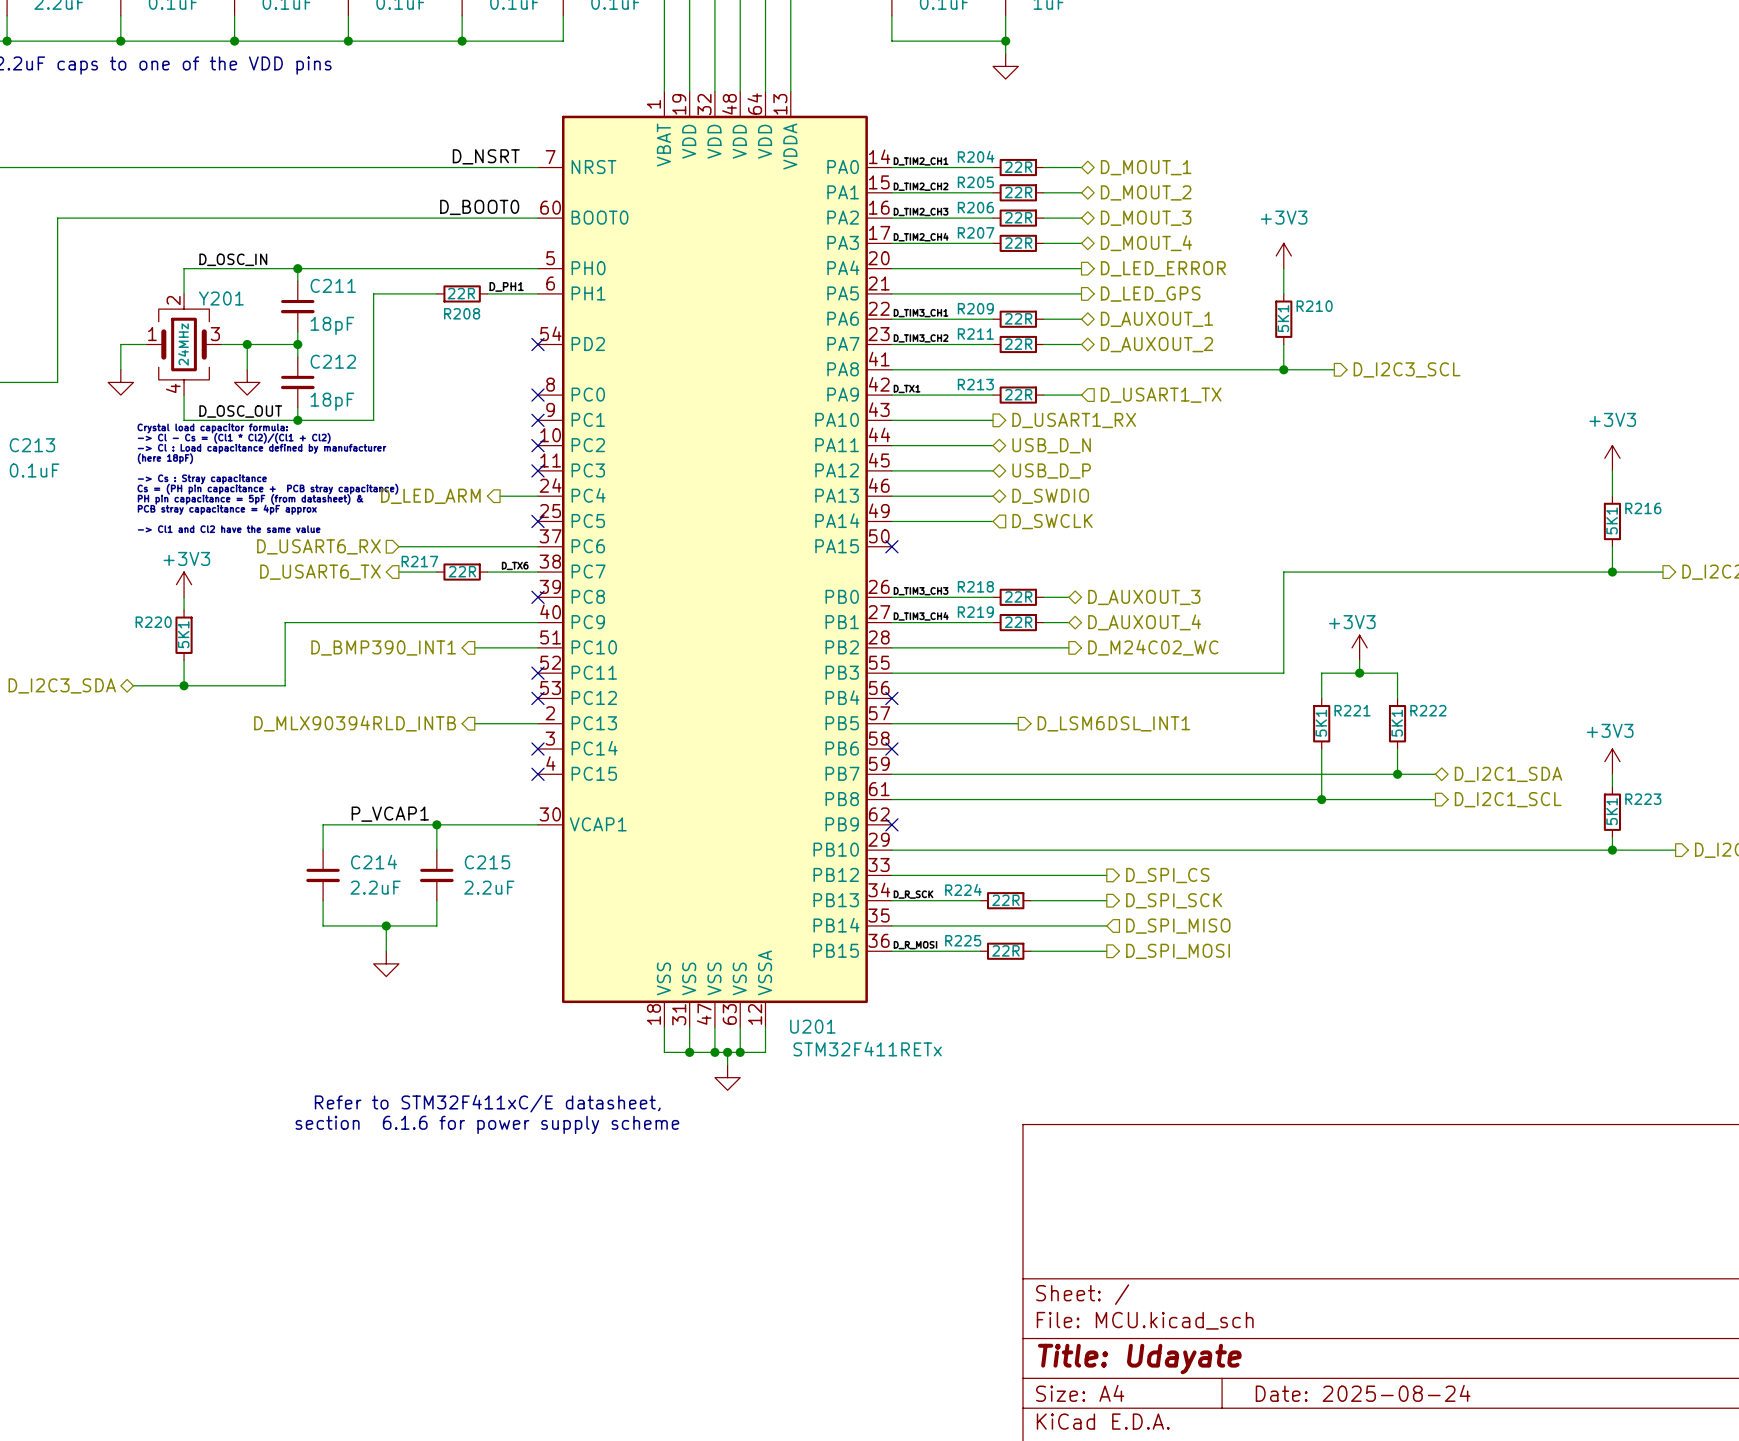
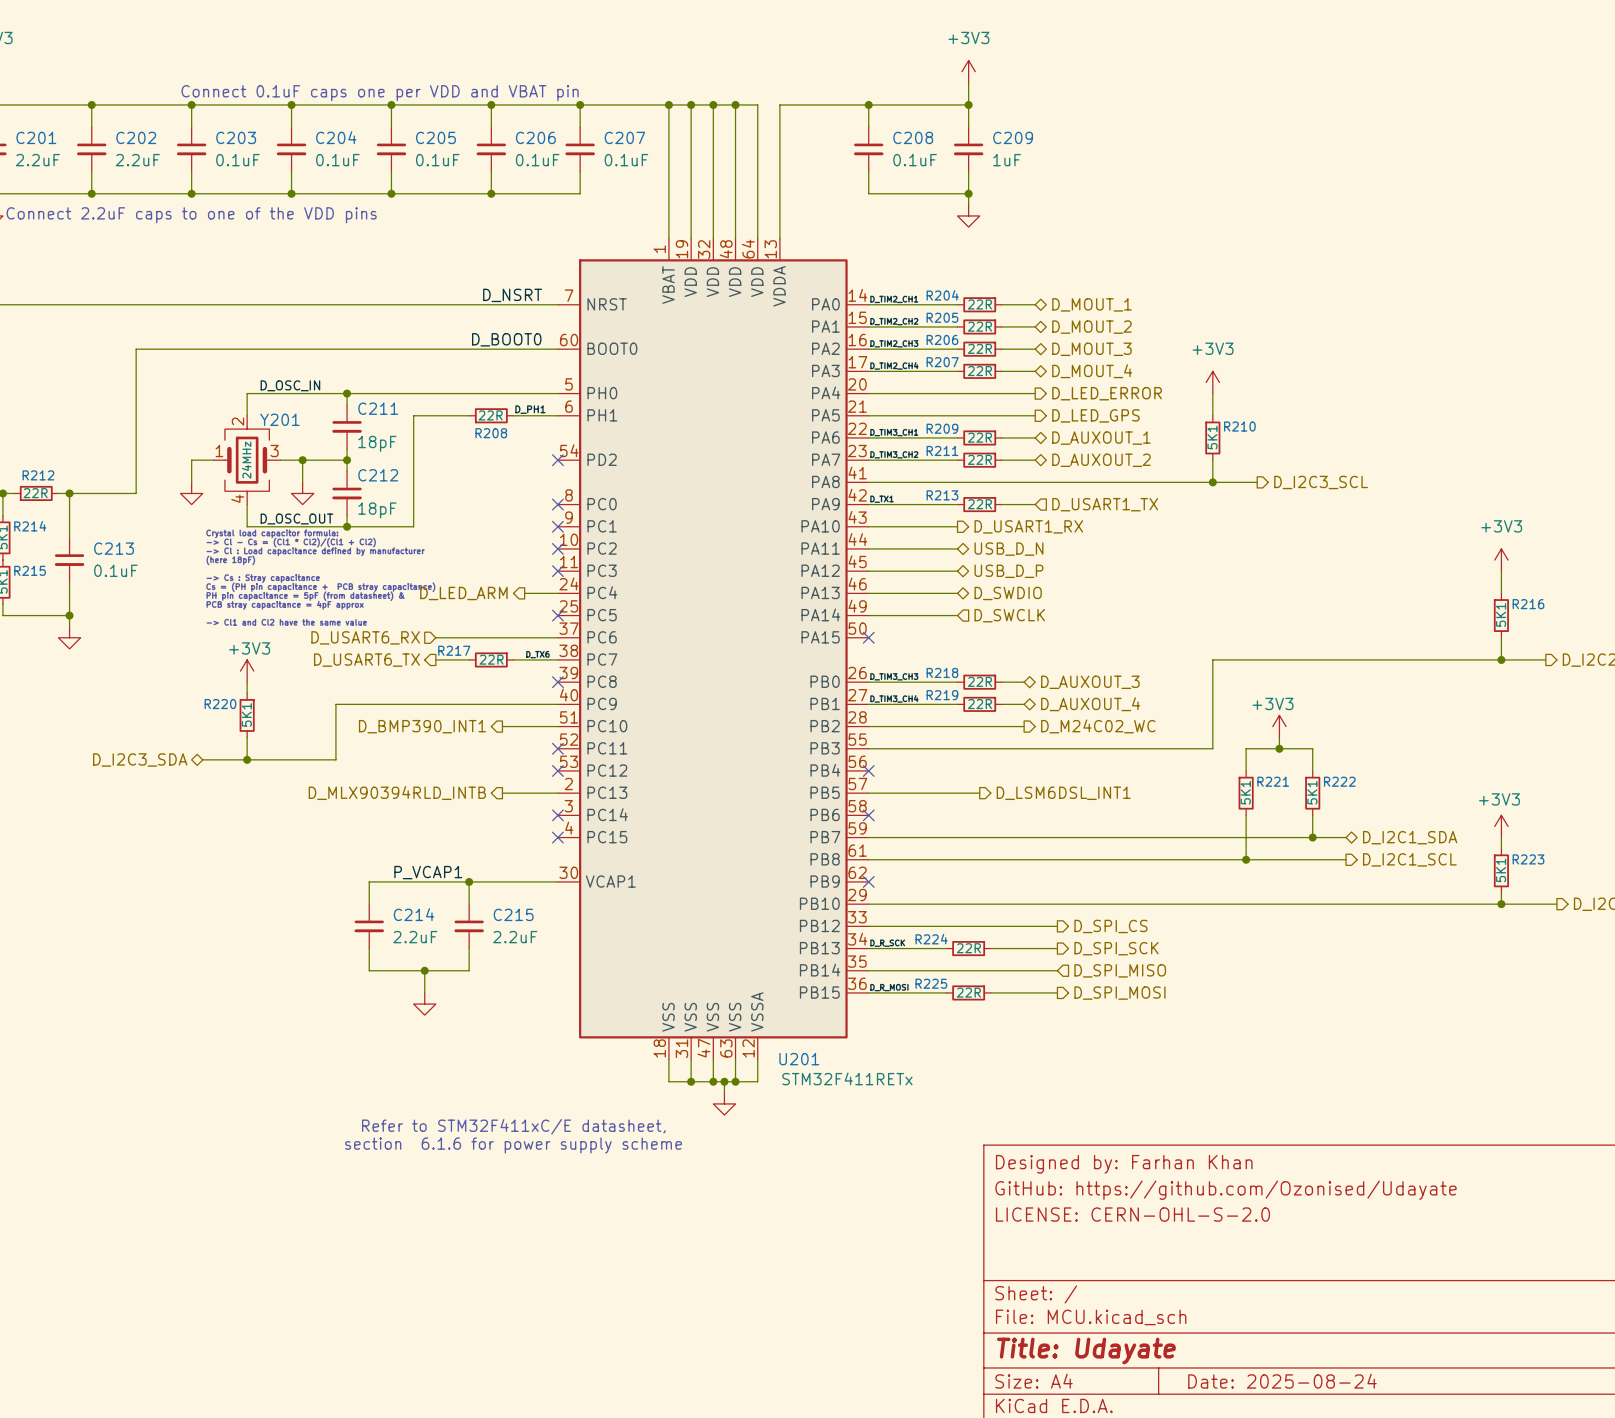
title block: none -> Designed by: Farhan Khan (1124, 1164)
title block: none -> GitHub: https://github.com/Ozonised/Udayate (1226, 1190)
title block: none -> LICENSE: CERN-OHL-S-2.0 (1132, 1214)

